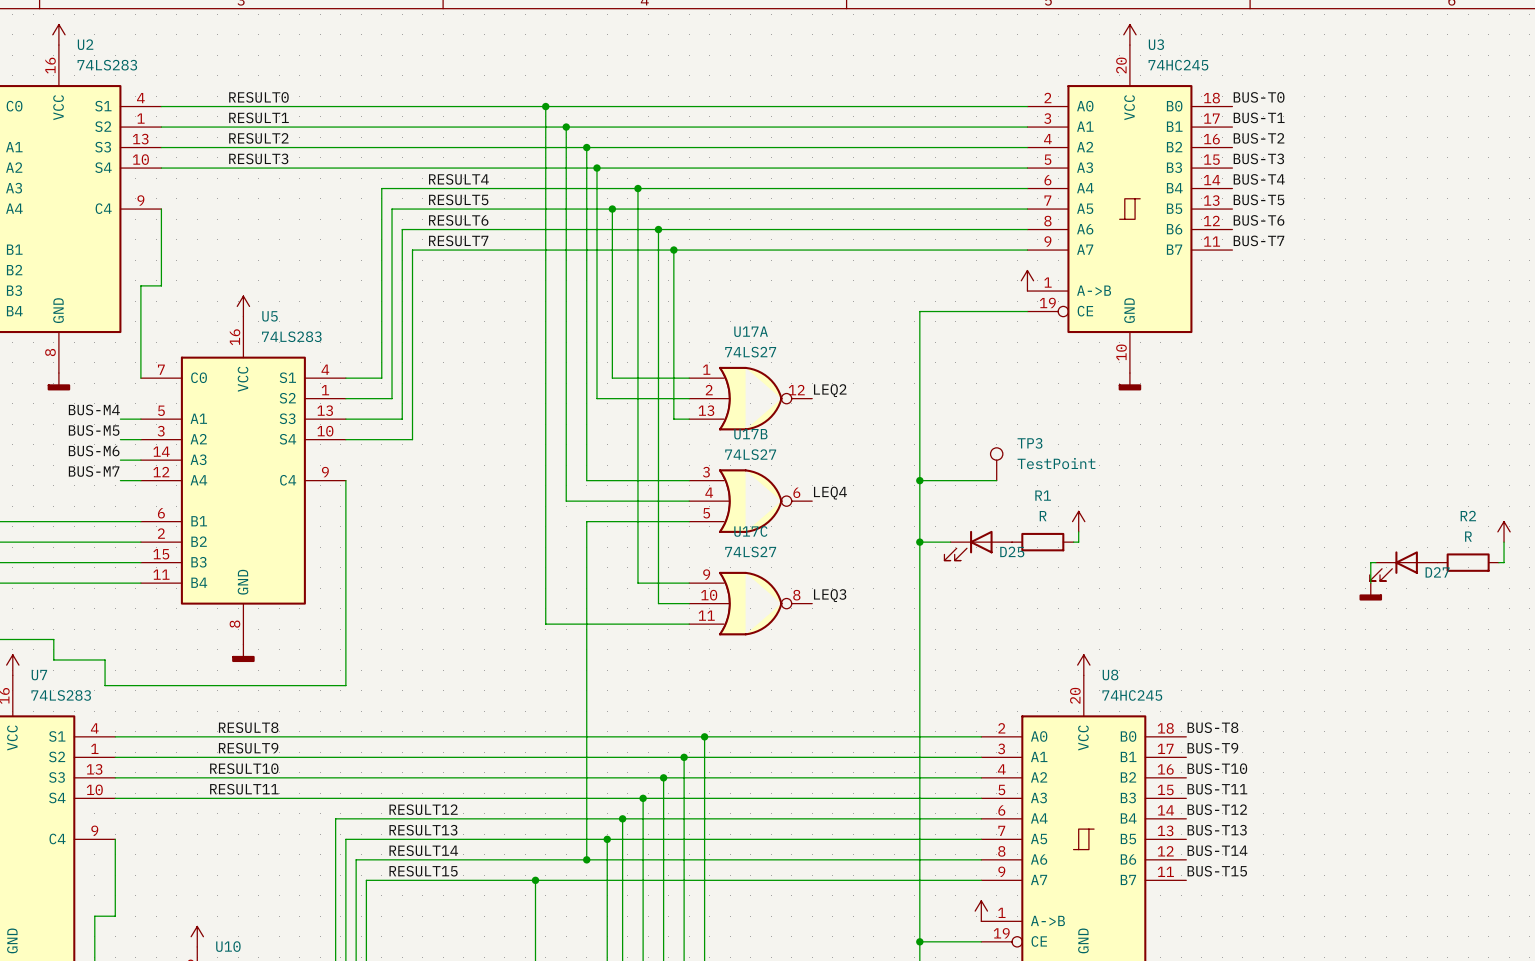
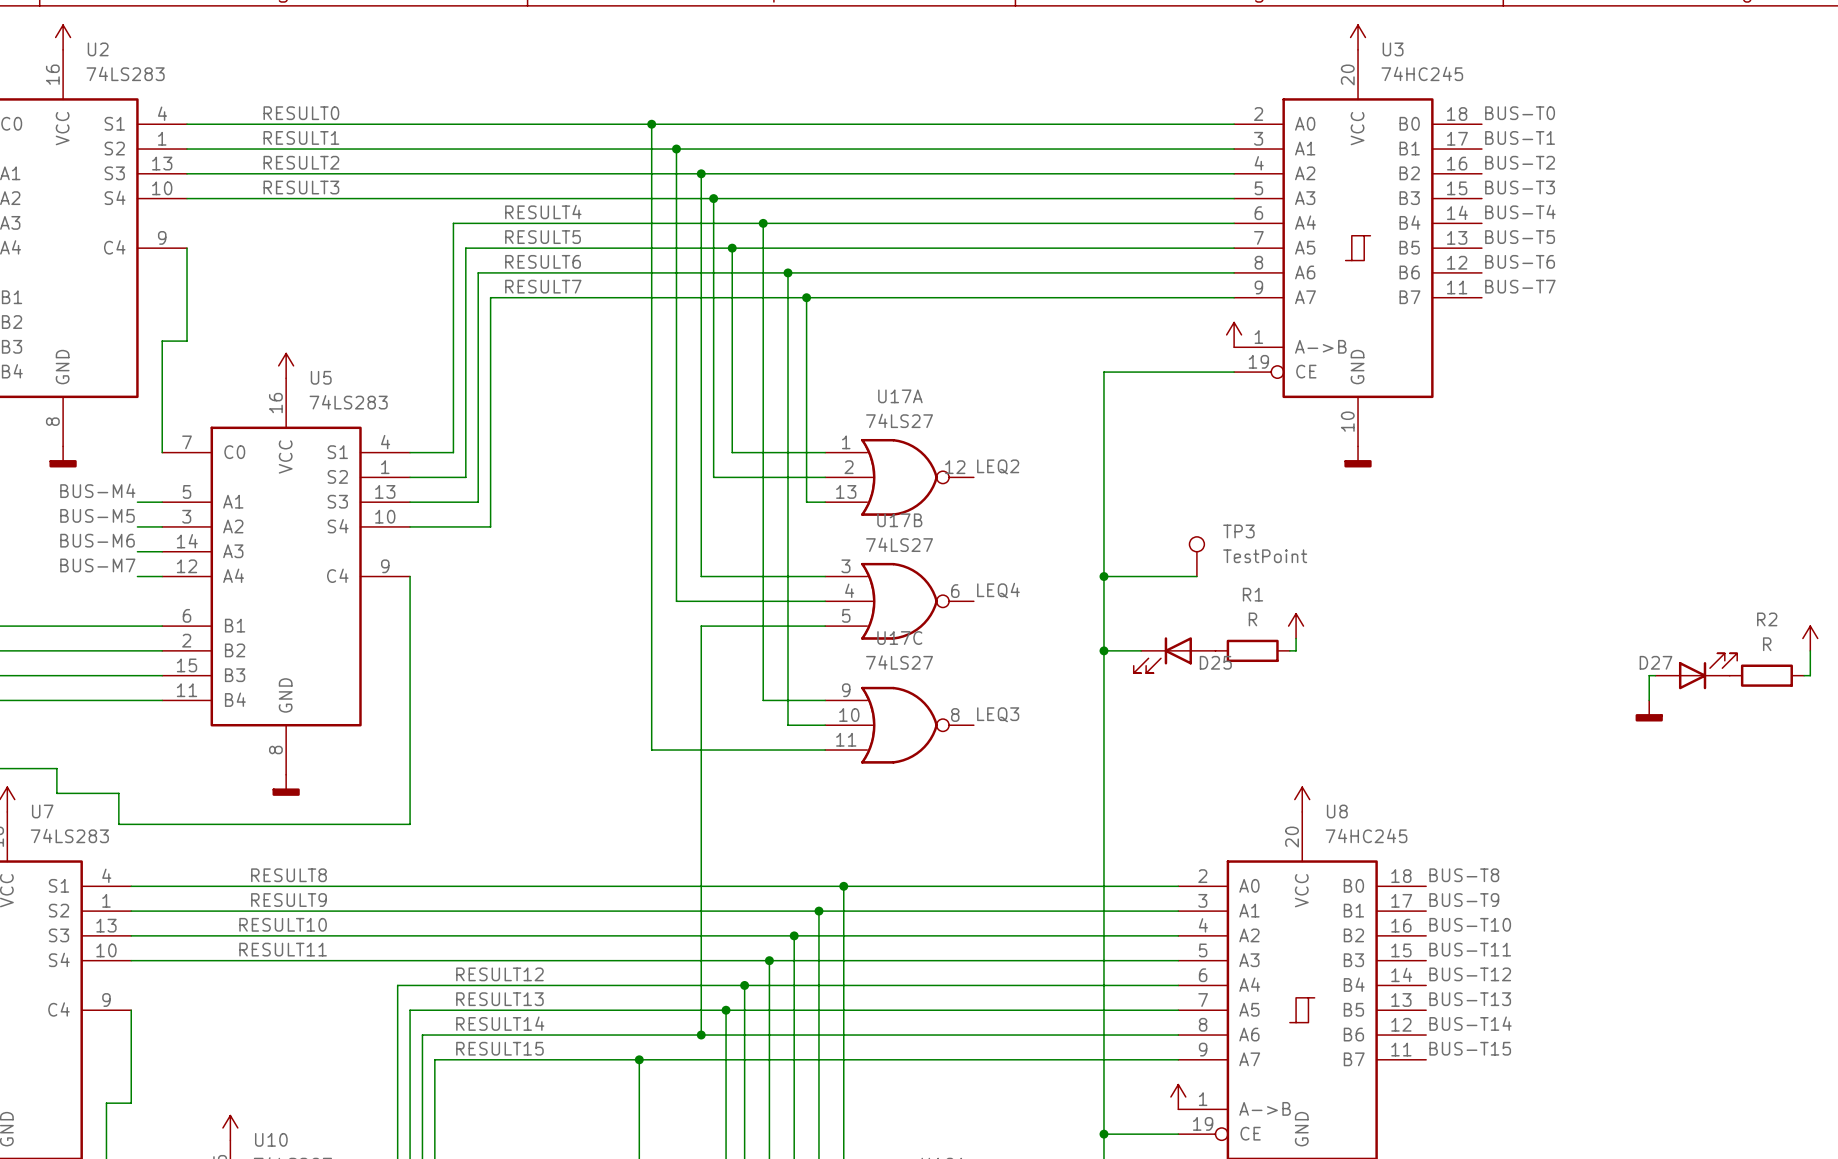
D27 rotation: 0° (1393, 566) -> 180° (1708, 671)

